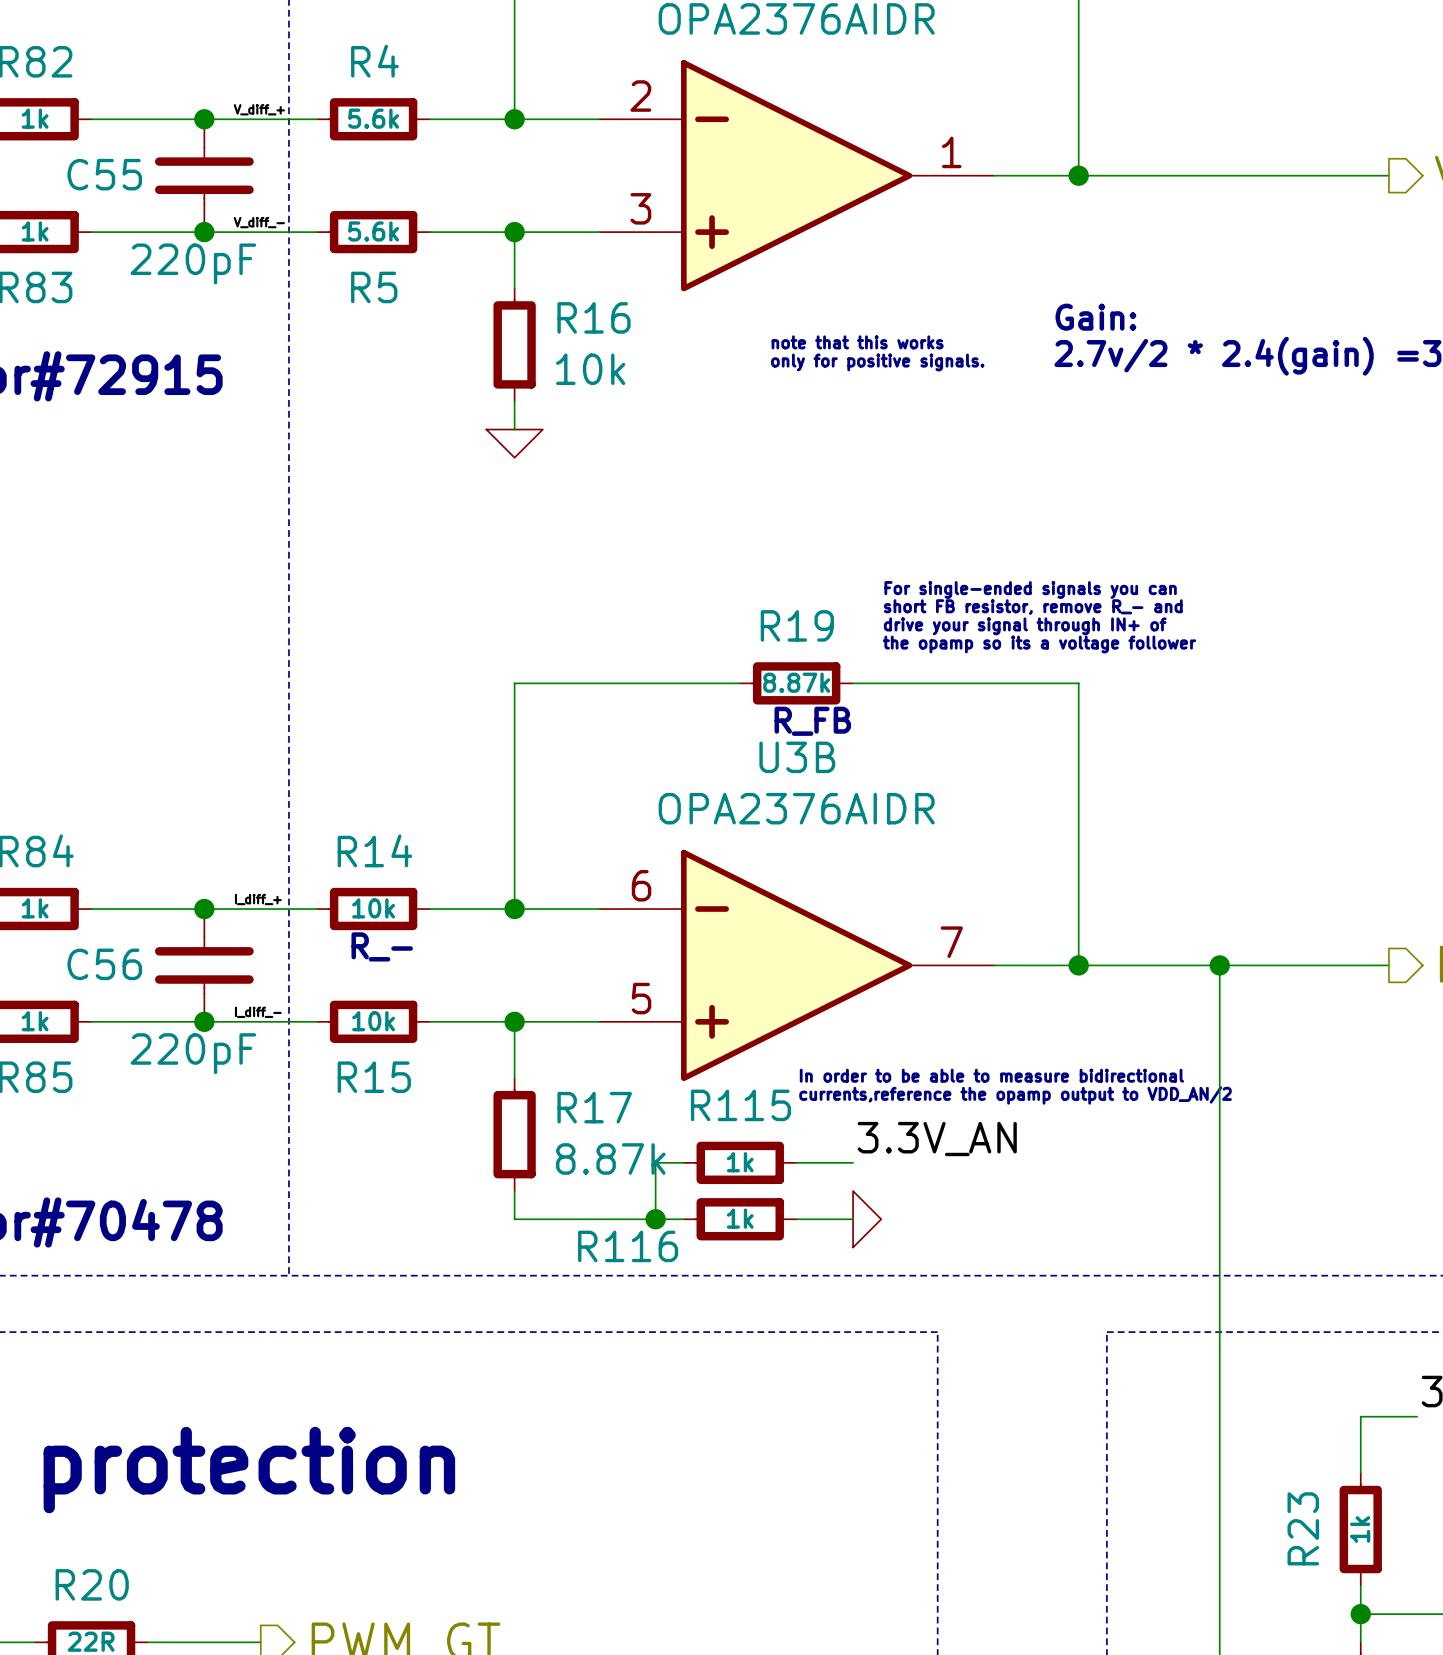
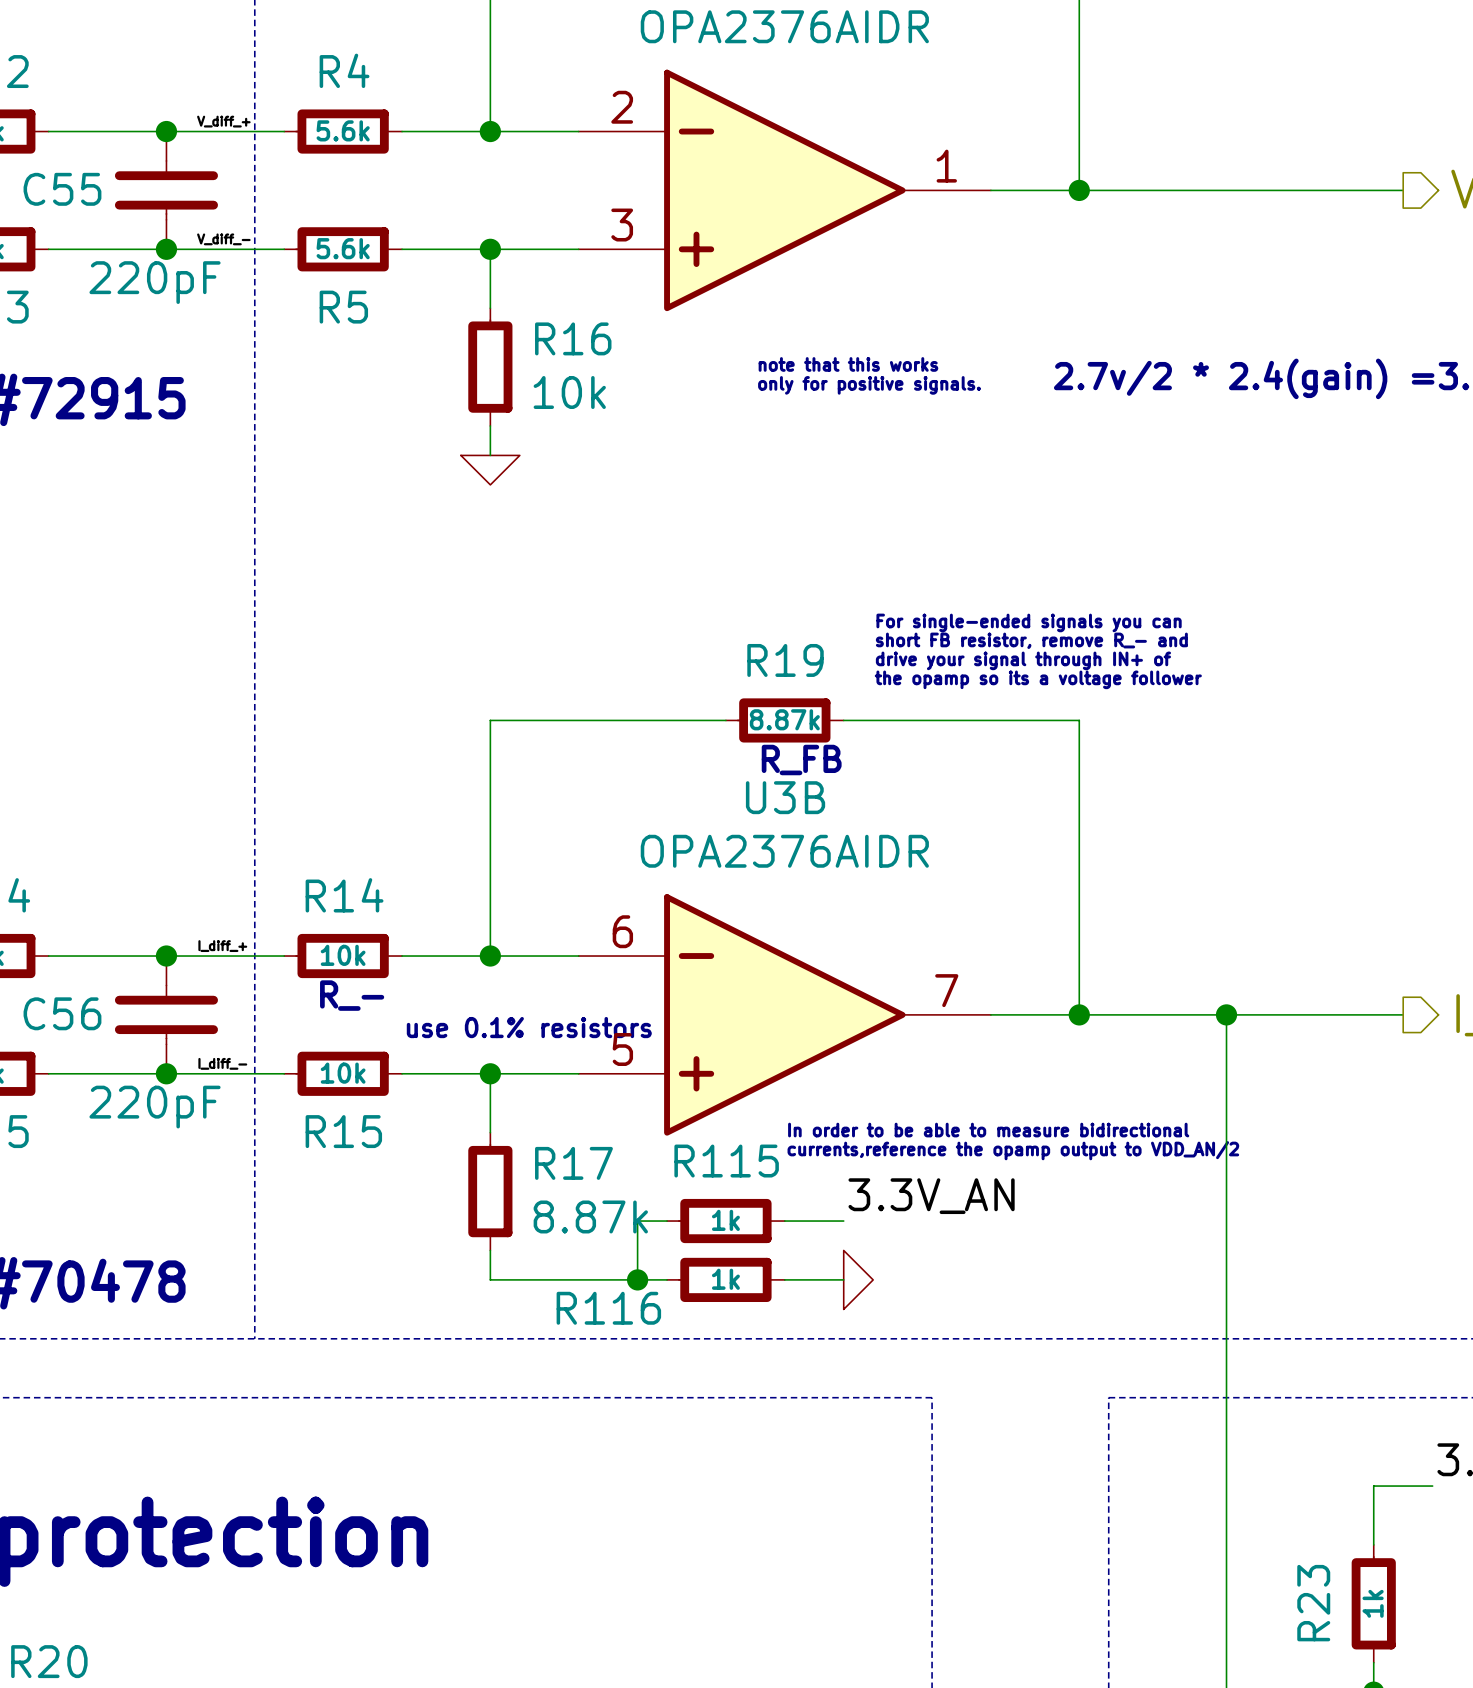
text: Gain: (1095, 317) -> none
text: none -> use 0.1% resistors (529, 1027)

